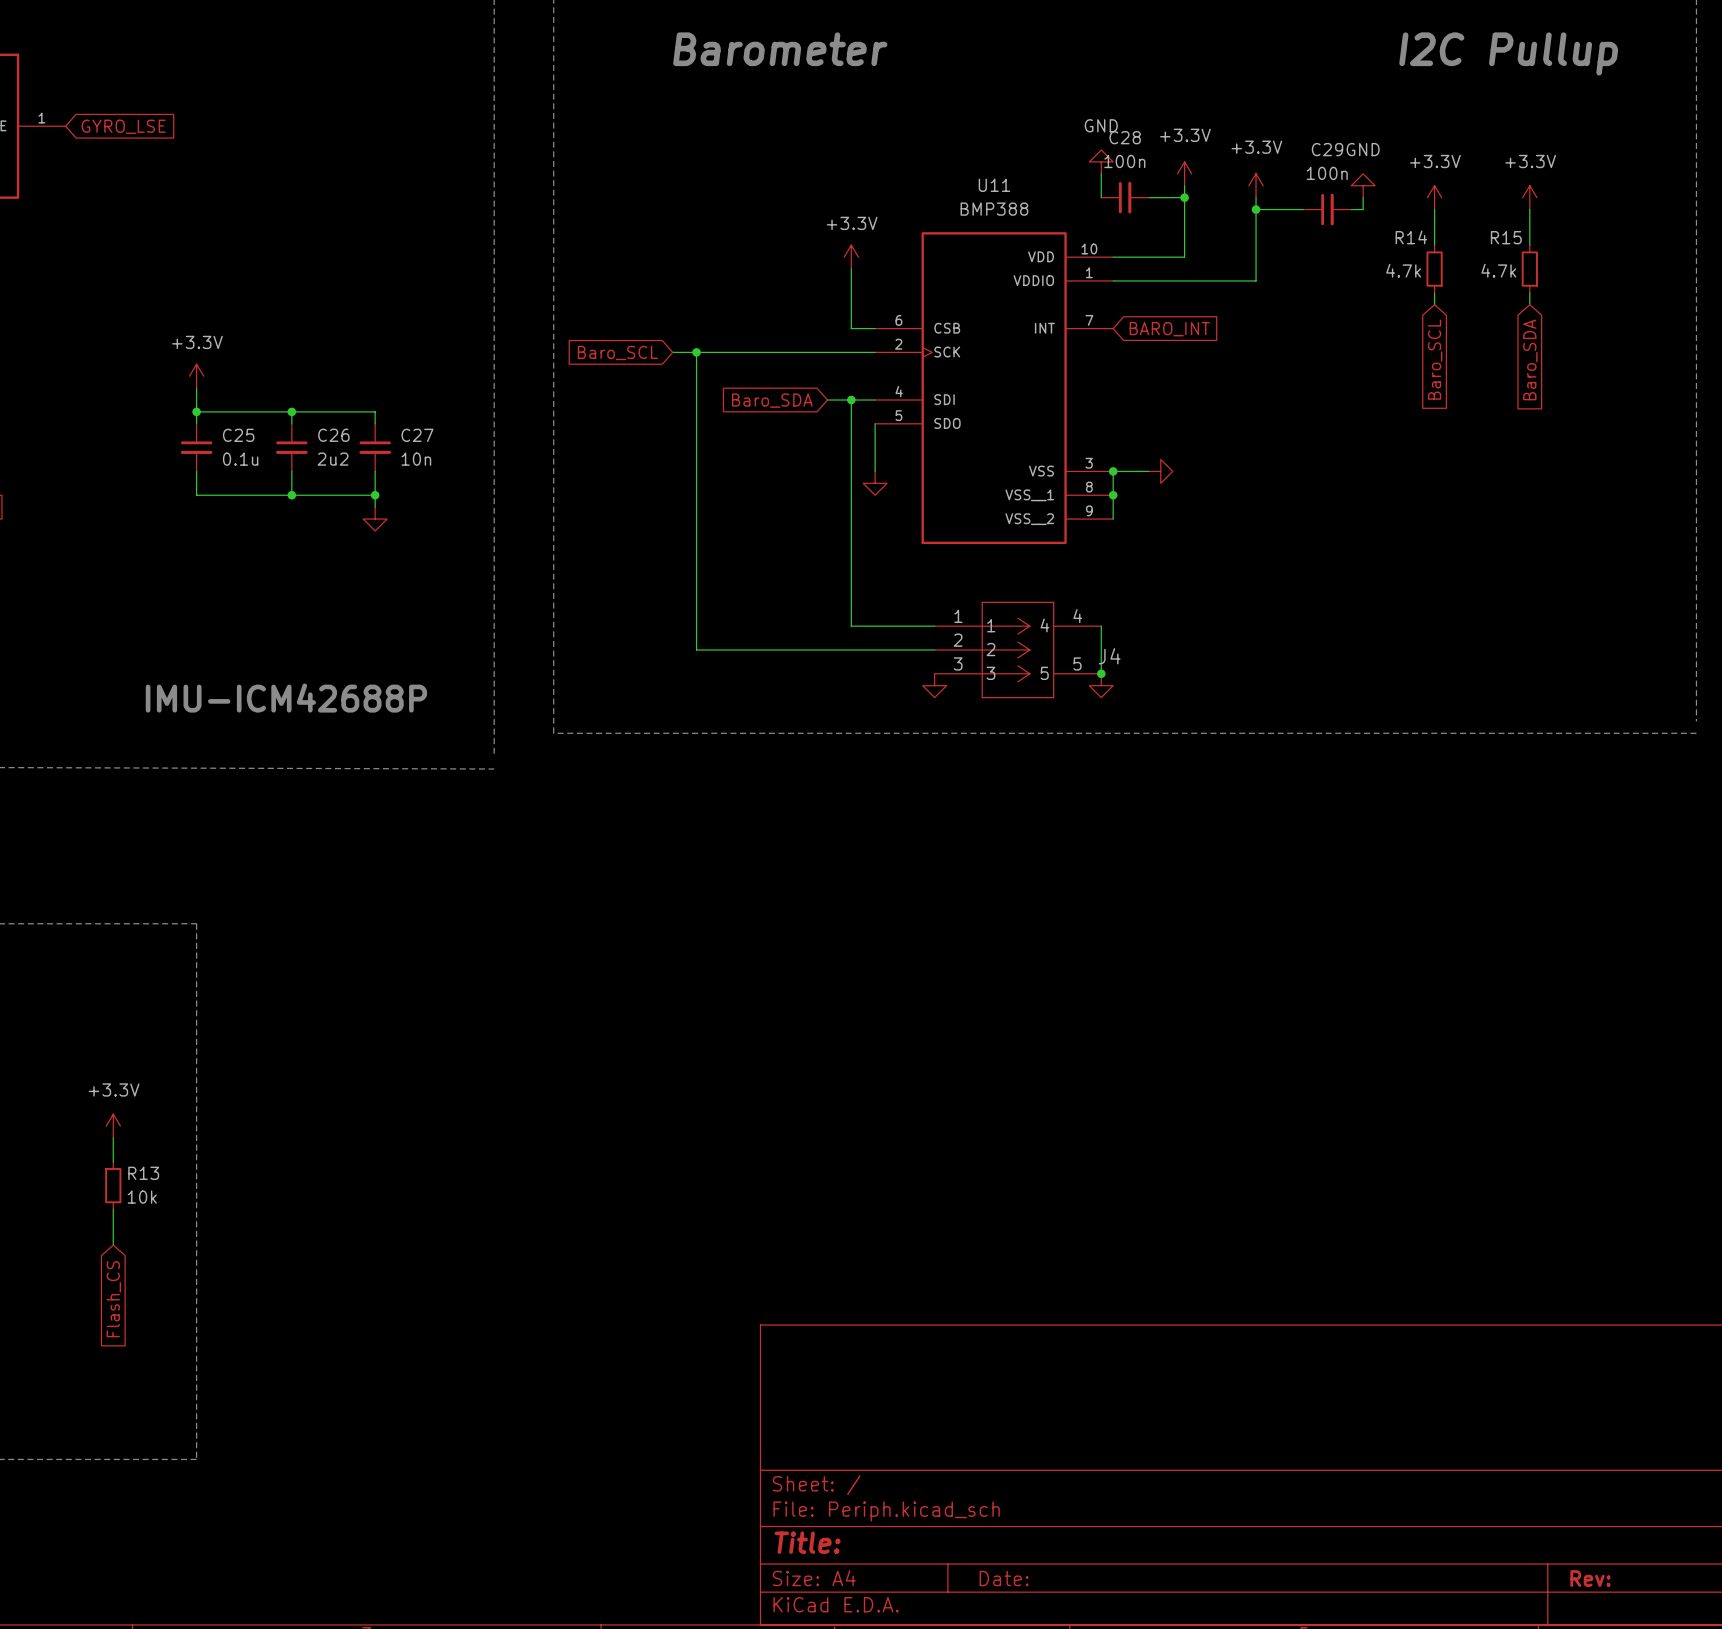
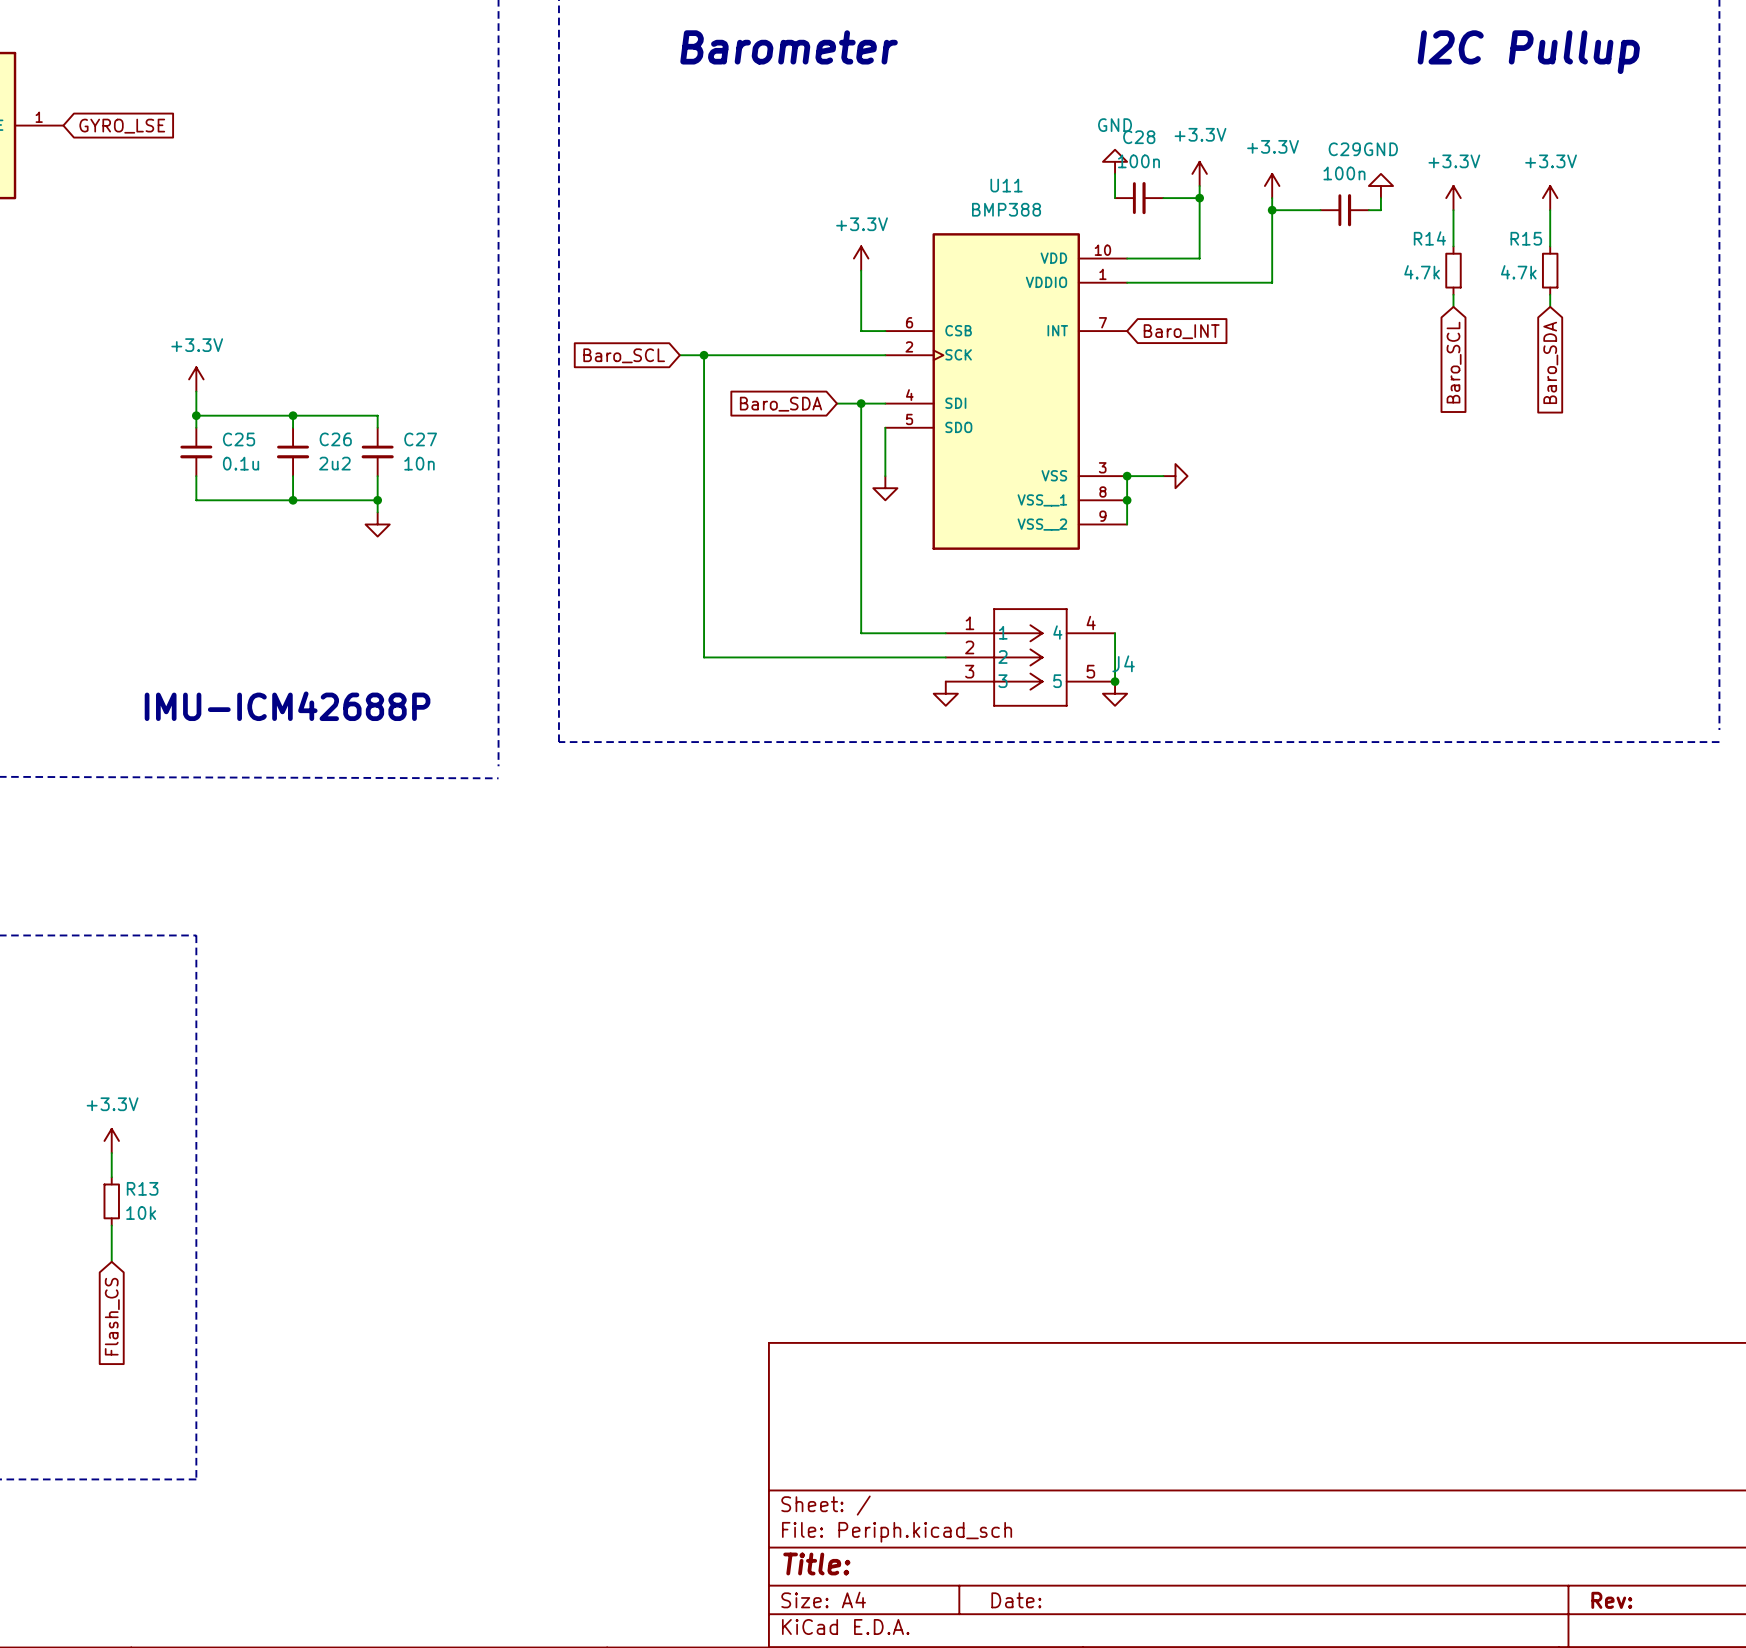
global label: BARO_INT (1169, 329) -> Baro_INT (1181, 331)

